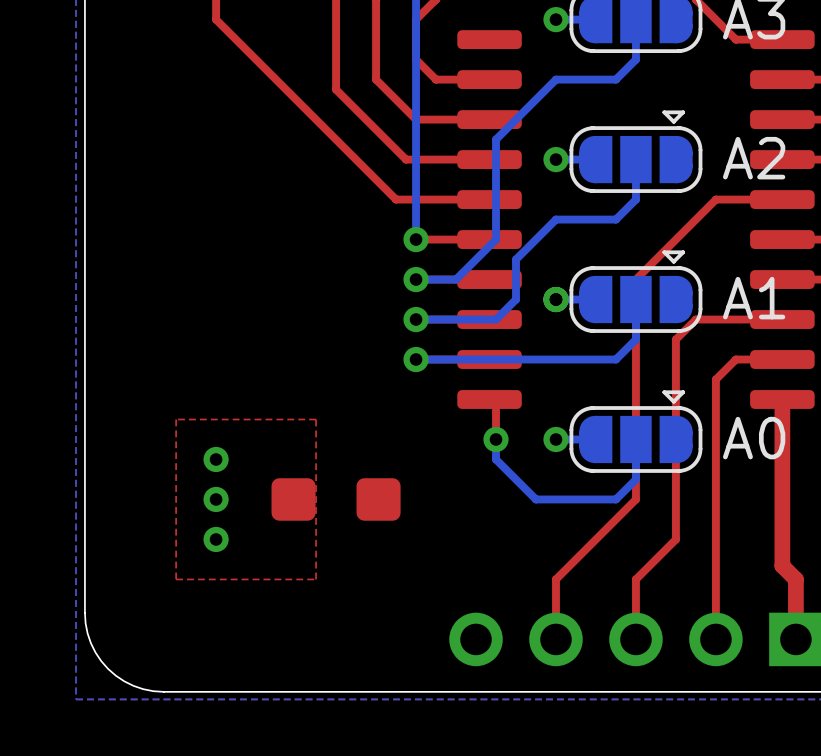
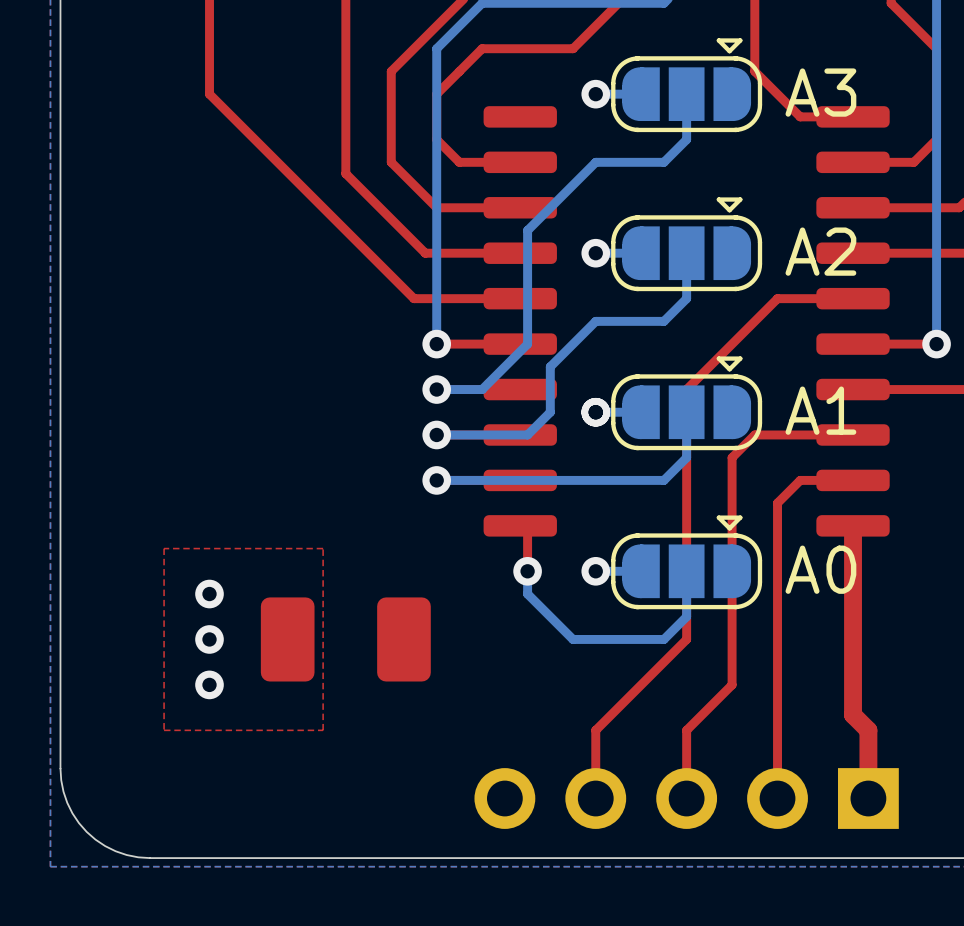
part footprint: [271, 478, 401, 521] -> [260, 597, 431, 682]

